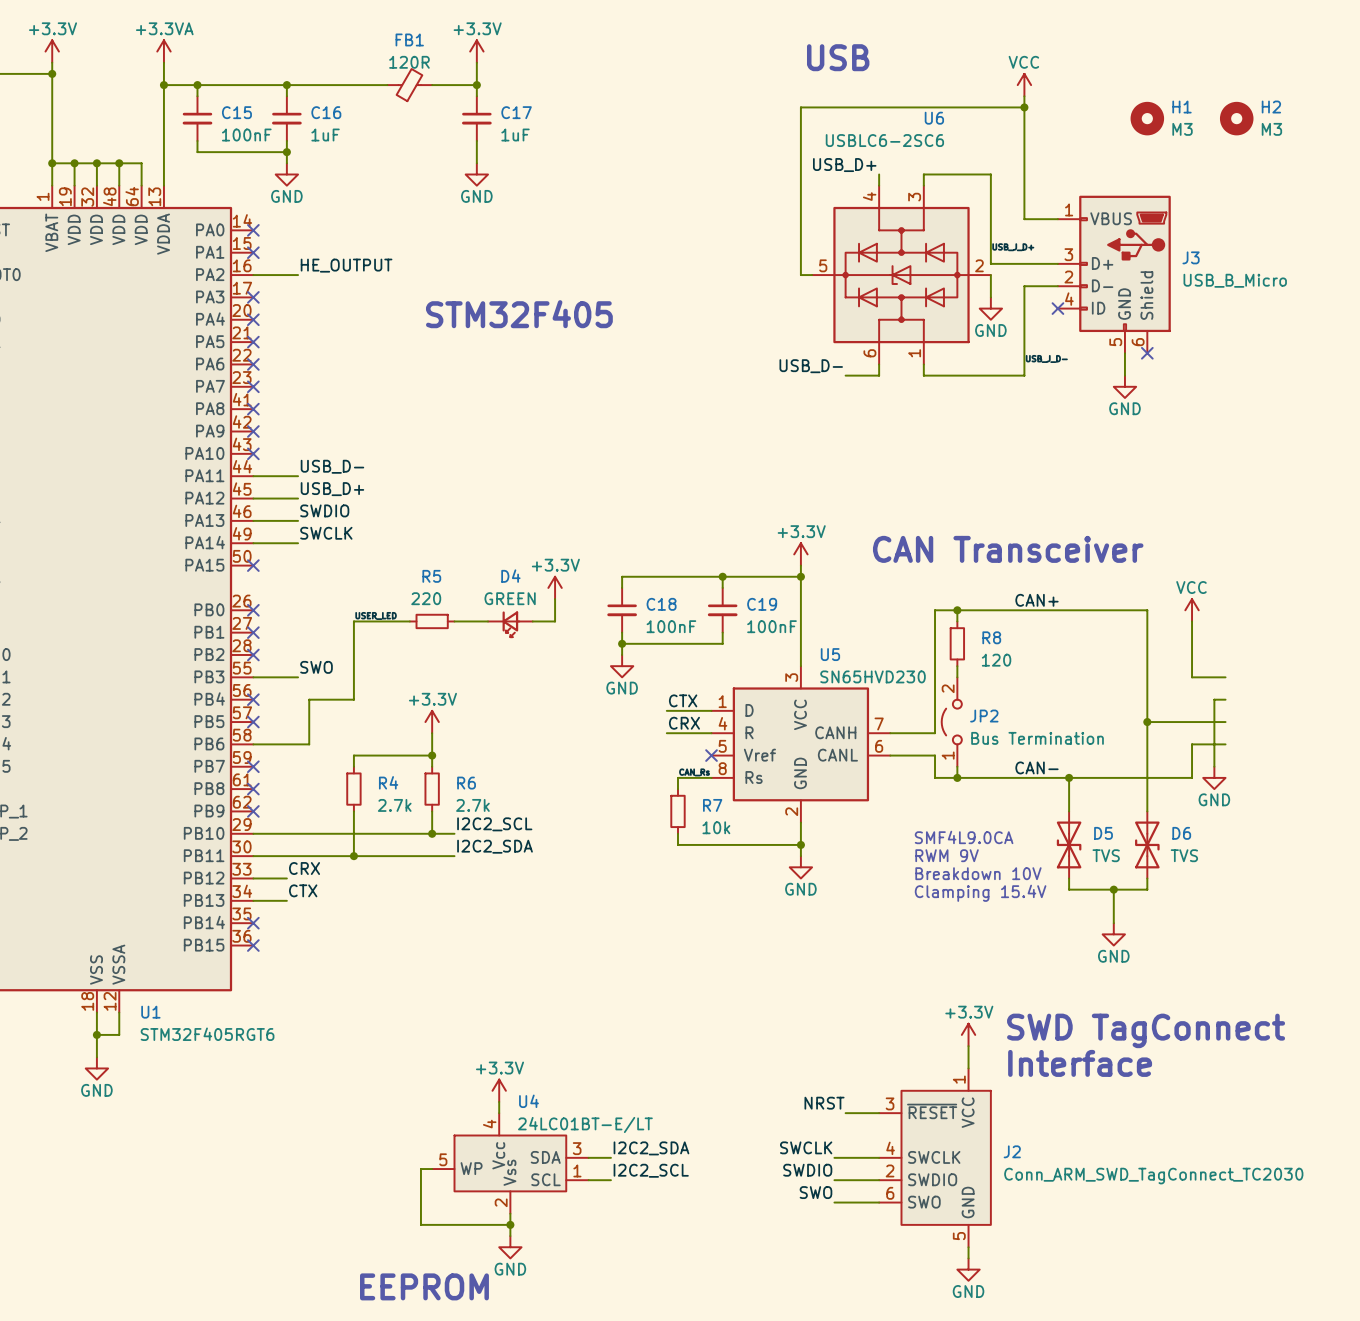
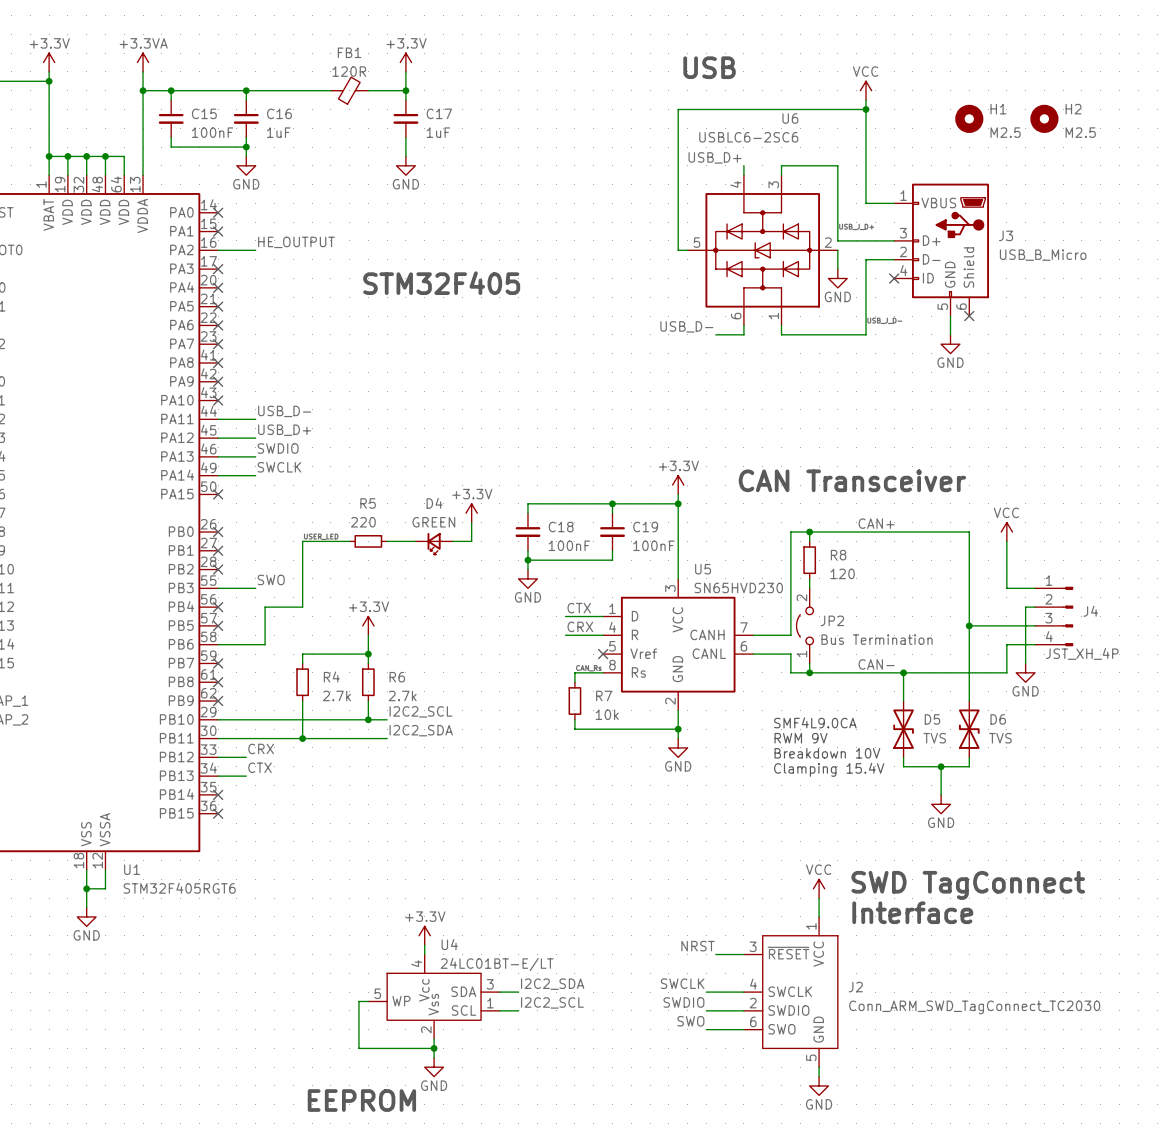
H1 value: M3 (1182, 129) -> M2.5 (1005, 132)
H2 value: M3 (1271, 129) -> M2.5 (1080, 132)
J4: none -> JST_XH_4P (1054, 616)
power symbol: +3.3V (968, 1034) -> VCC (819, 888)

